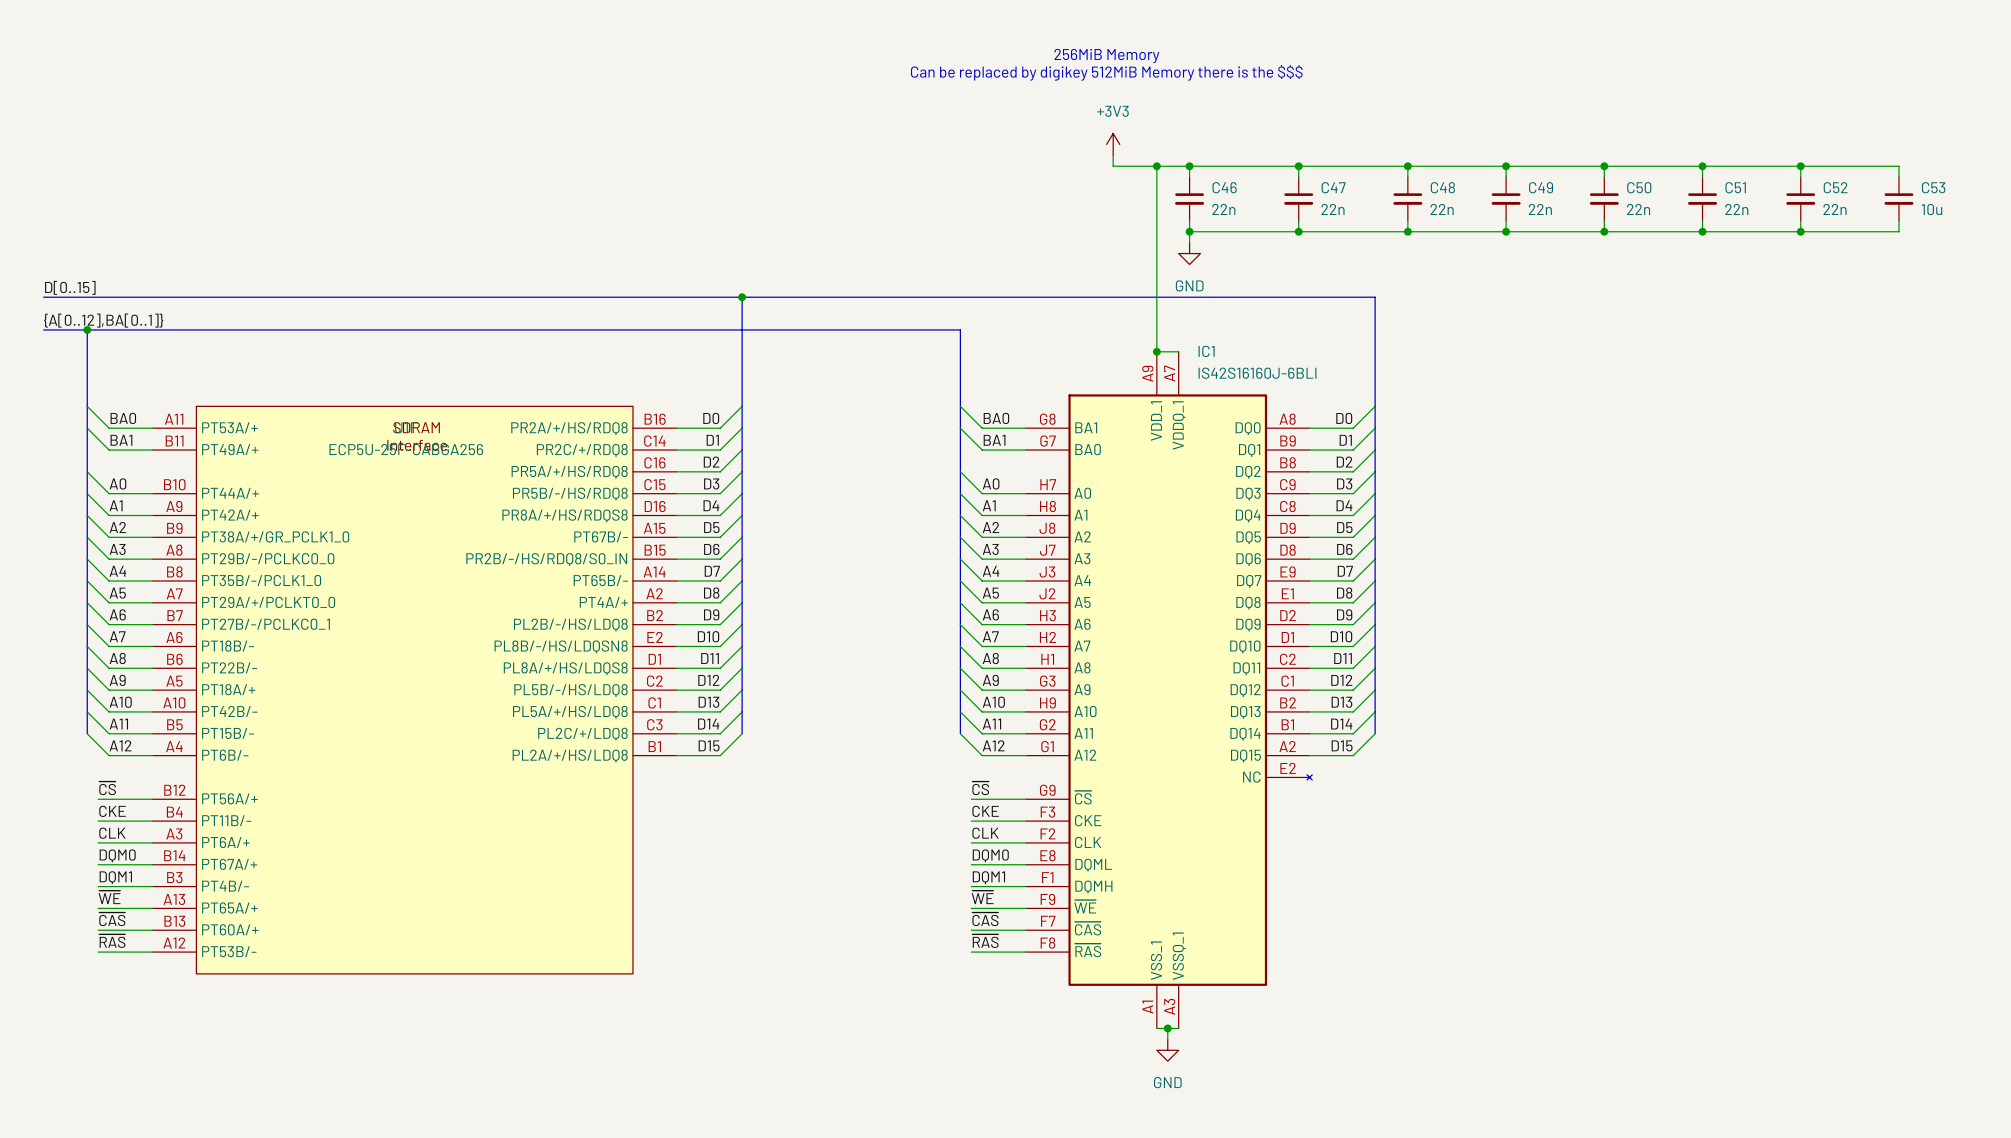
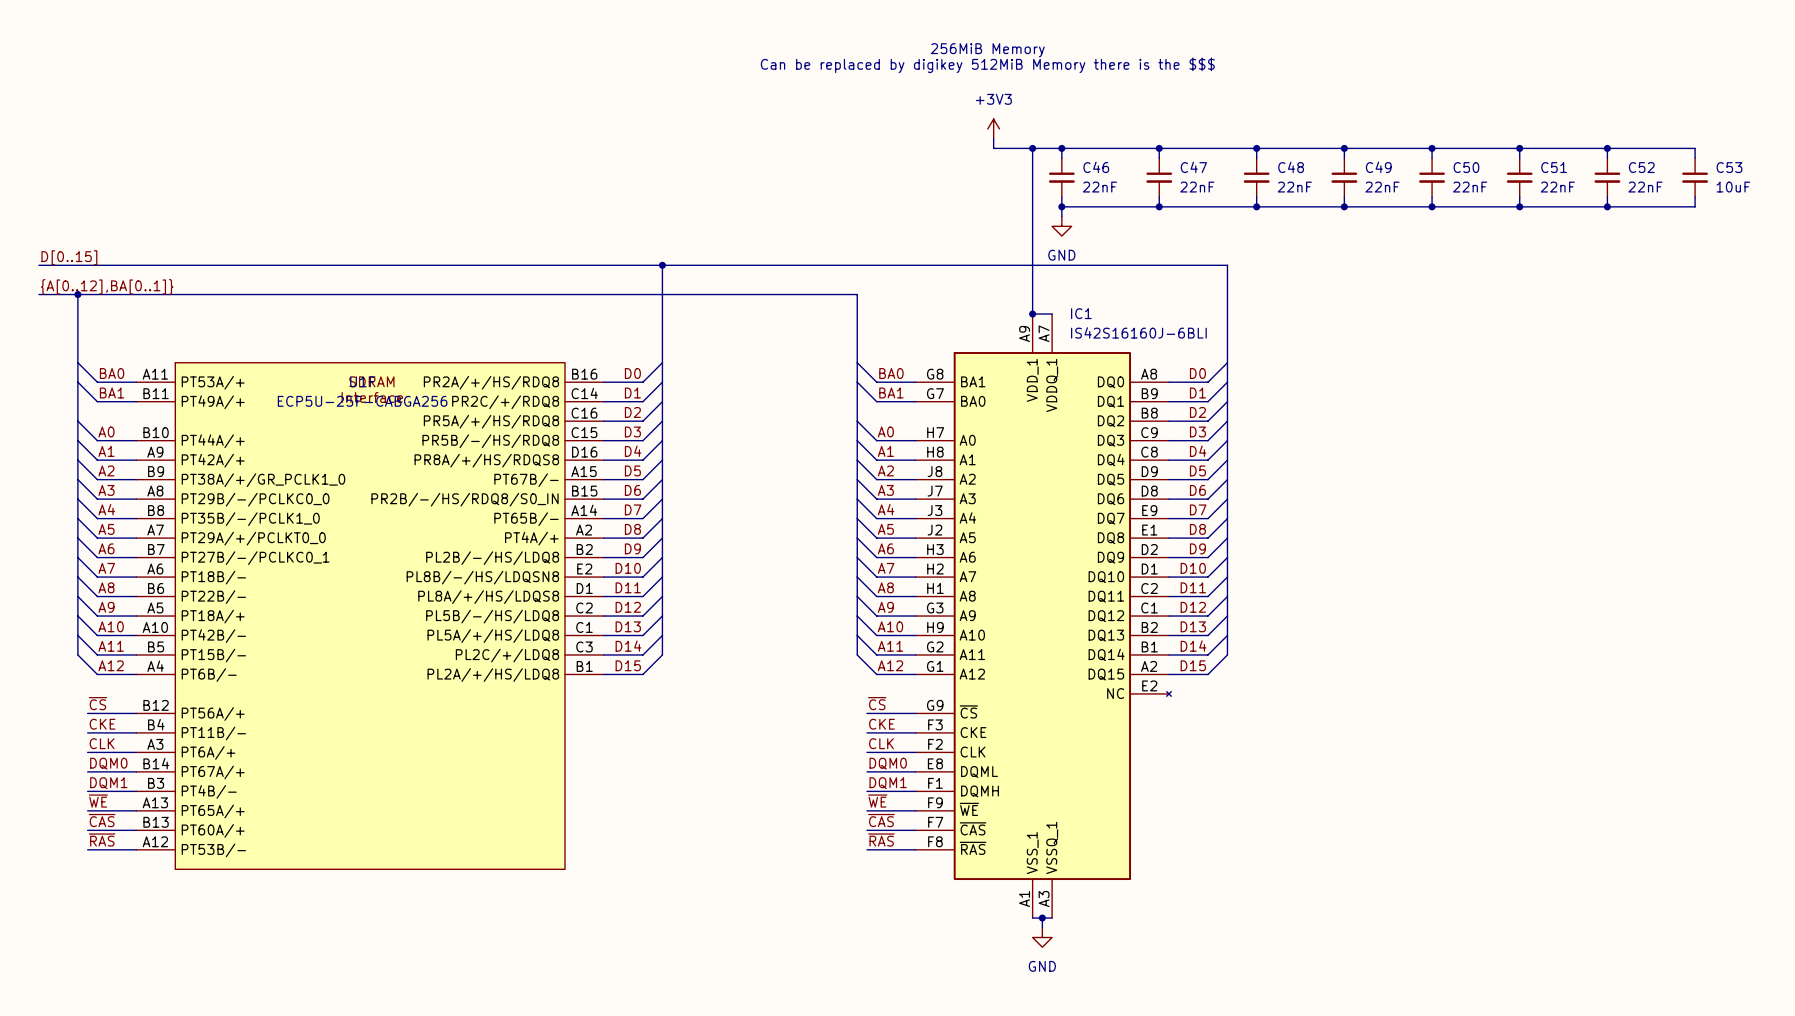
C46 value: 22n (1223, 209) -> 22nF (1099, 187)
C47 value: 22n (1332, 209) -> 22nF (1197, 187)
C48 value: 22n (1442, 209) -> 22nF (1294, 187)
C49 value: 22n (1540, 209) -> 22nF (1382, 187)
C50 value: 22n (1638, 209) -> 22nF (1470, 187)
C51 value: 22n (1736, 209) -> 22nF (1557, 187)
C52 value: 22n (1835, 209) -> 22nF (1645, 187)
C53 value: 10u (1931, 209) -> 10uF (1733, 187)

